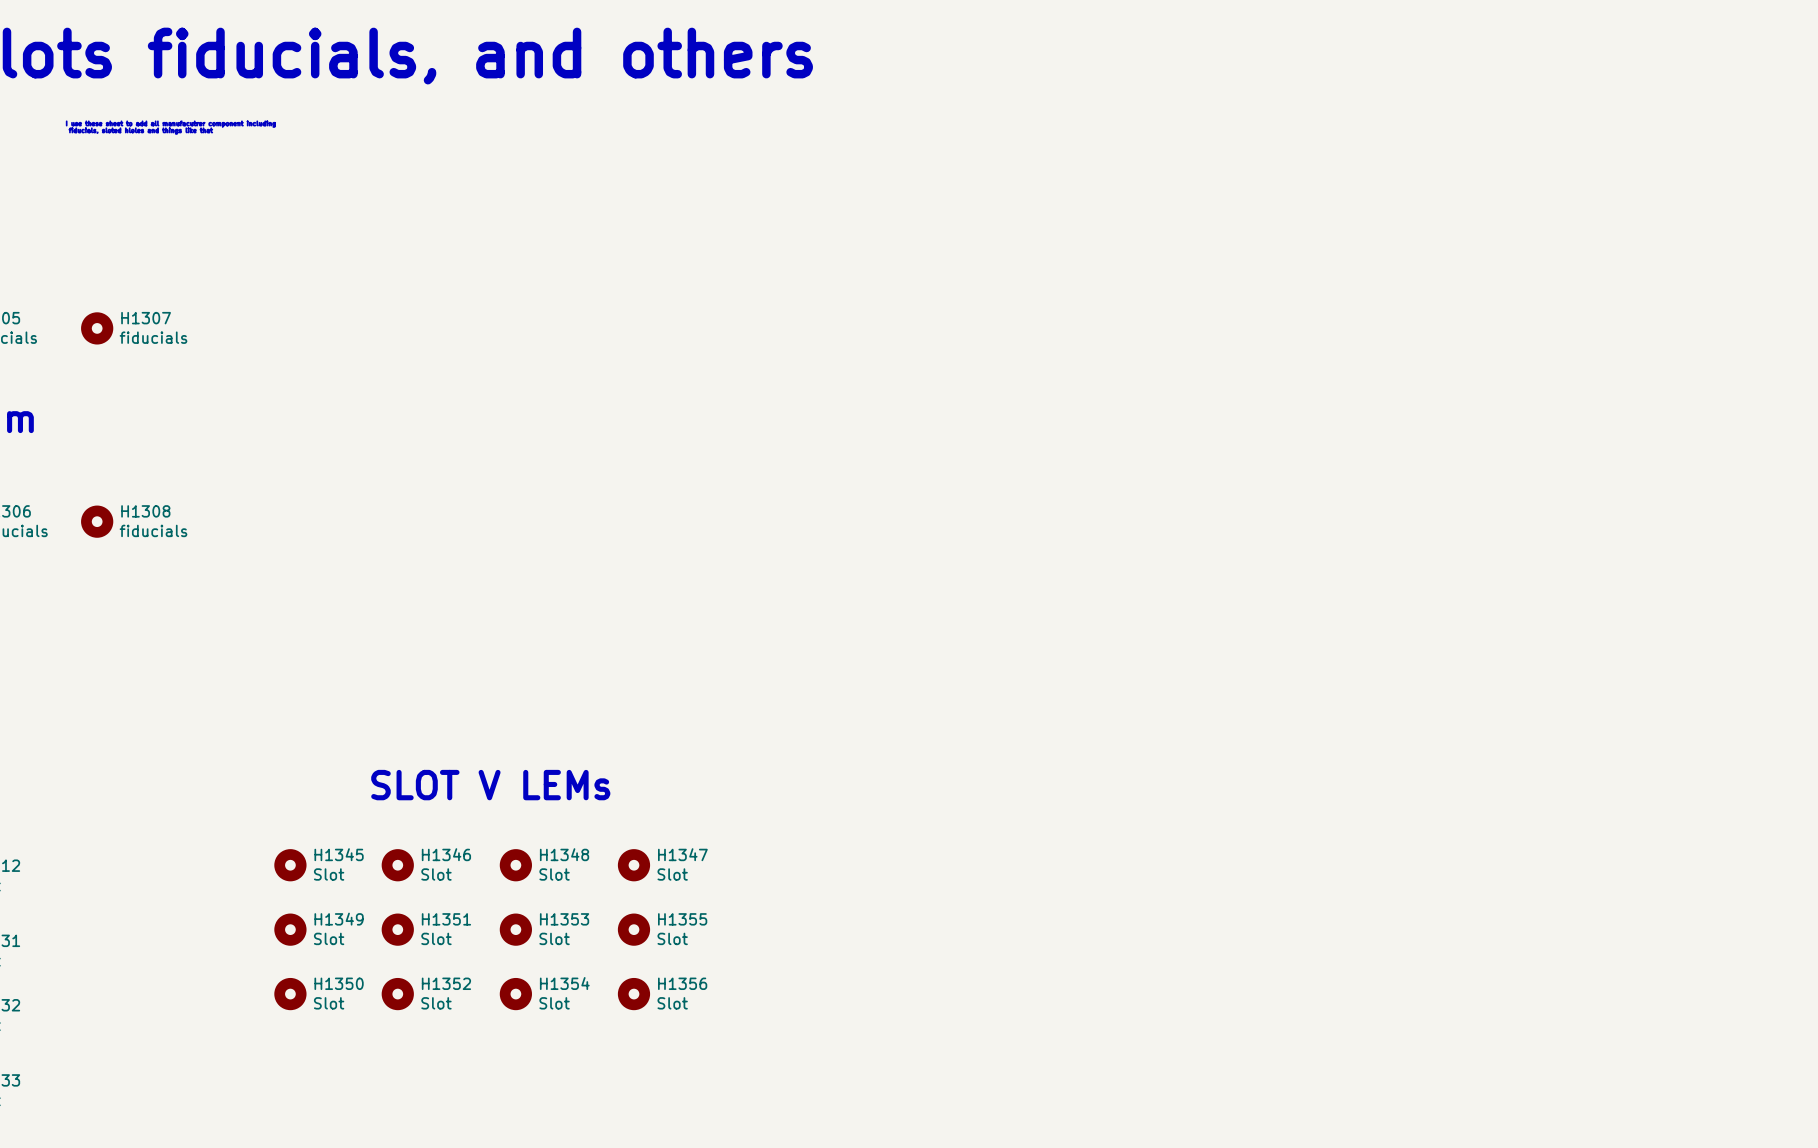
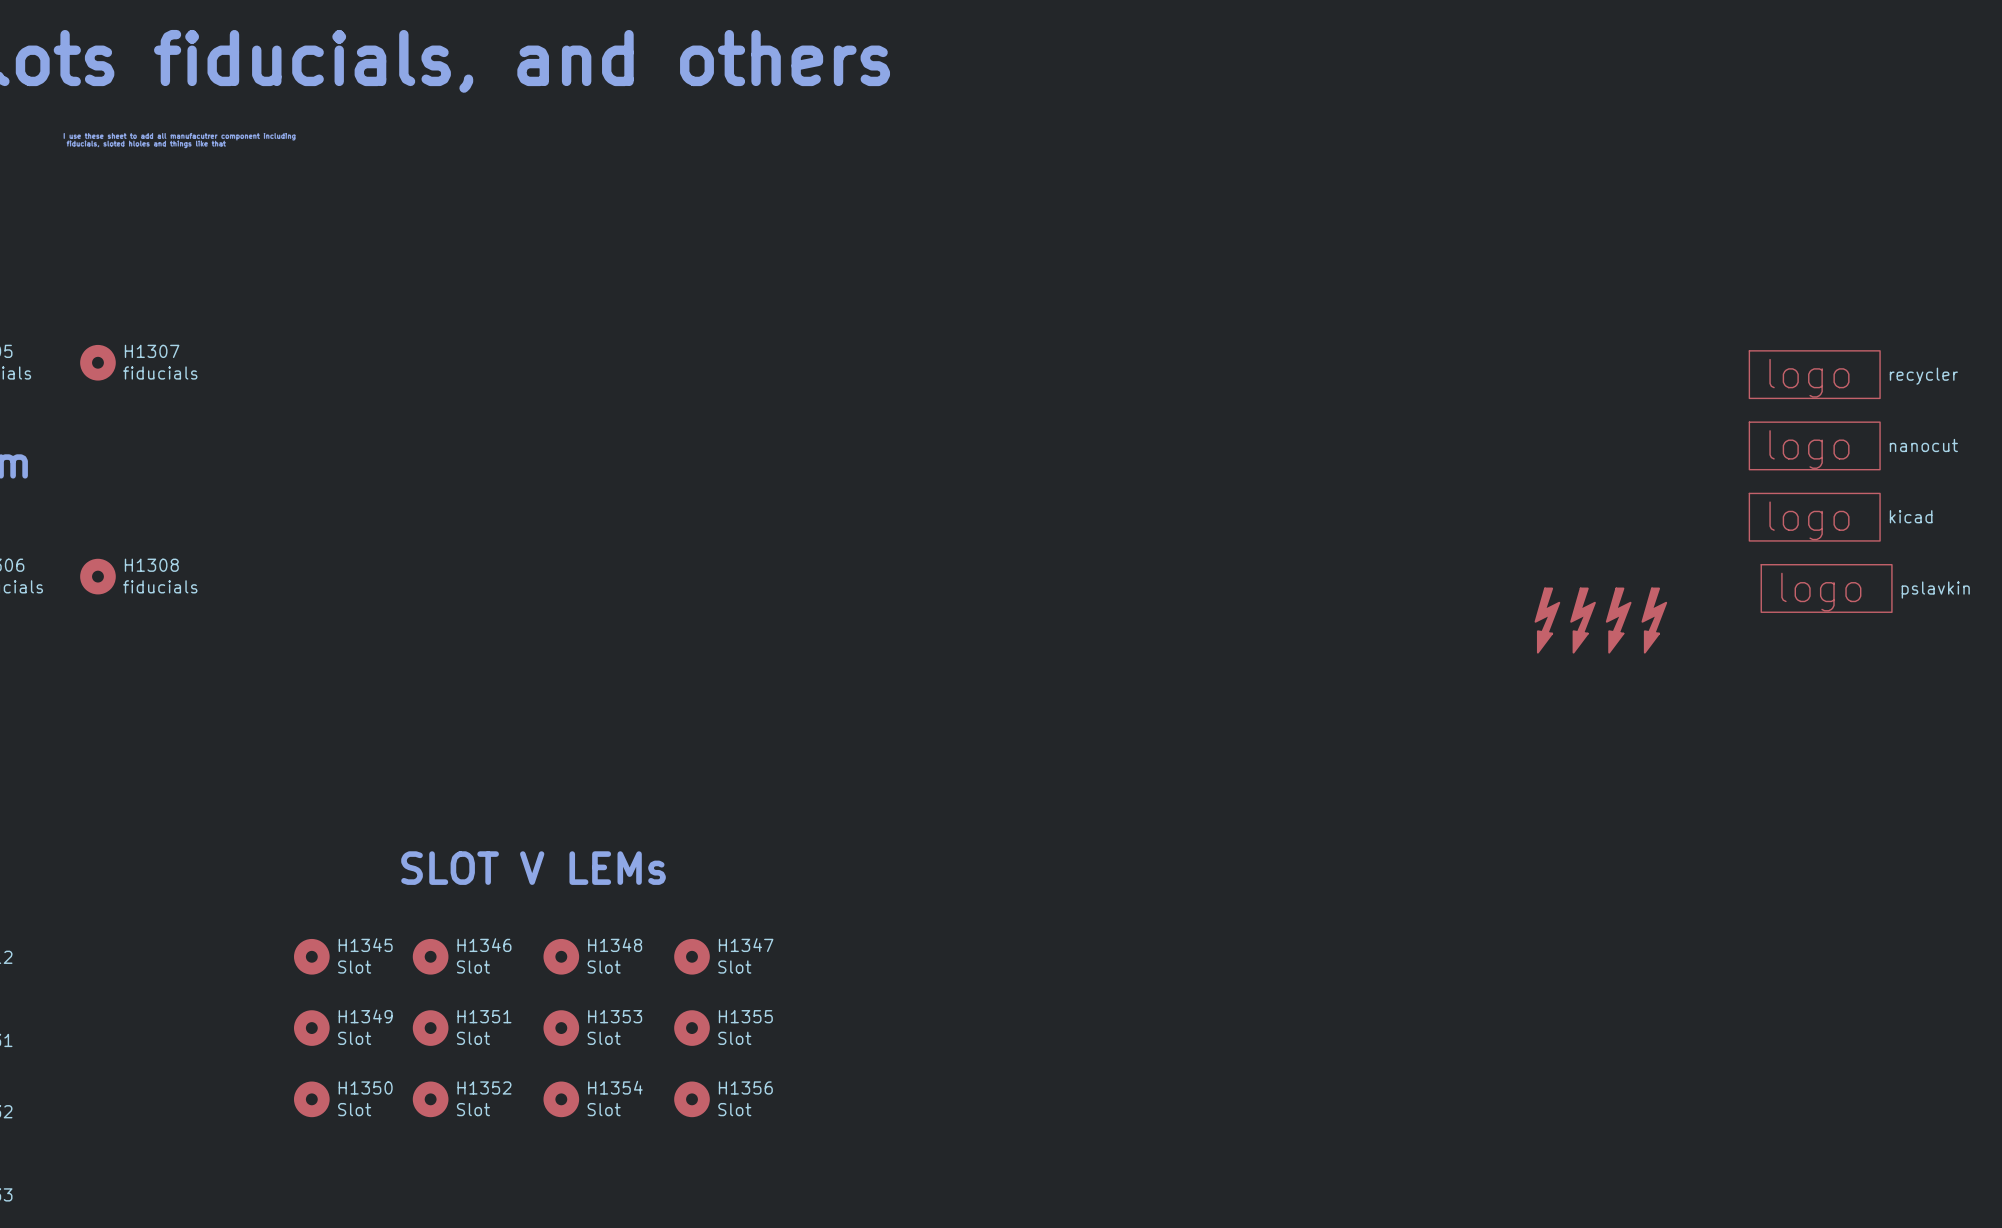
part: none -> recycler (1814, 374)
part: none -> nanocut (1814, 445)
part: none -> kicad (1814, 517)
part: none -> pslavkin (1826, 588)
part: none -> (1547, 620)
part: none -> (1583, 620)
part: none -> (1618, 620)
part: none -> (1654, 620)

